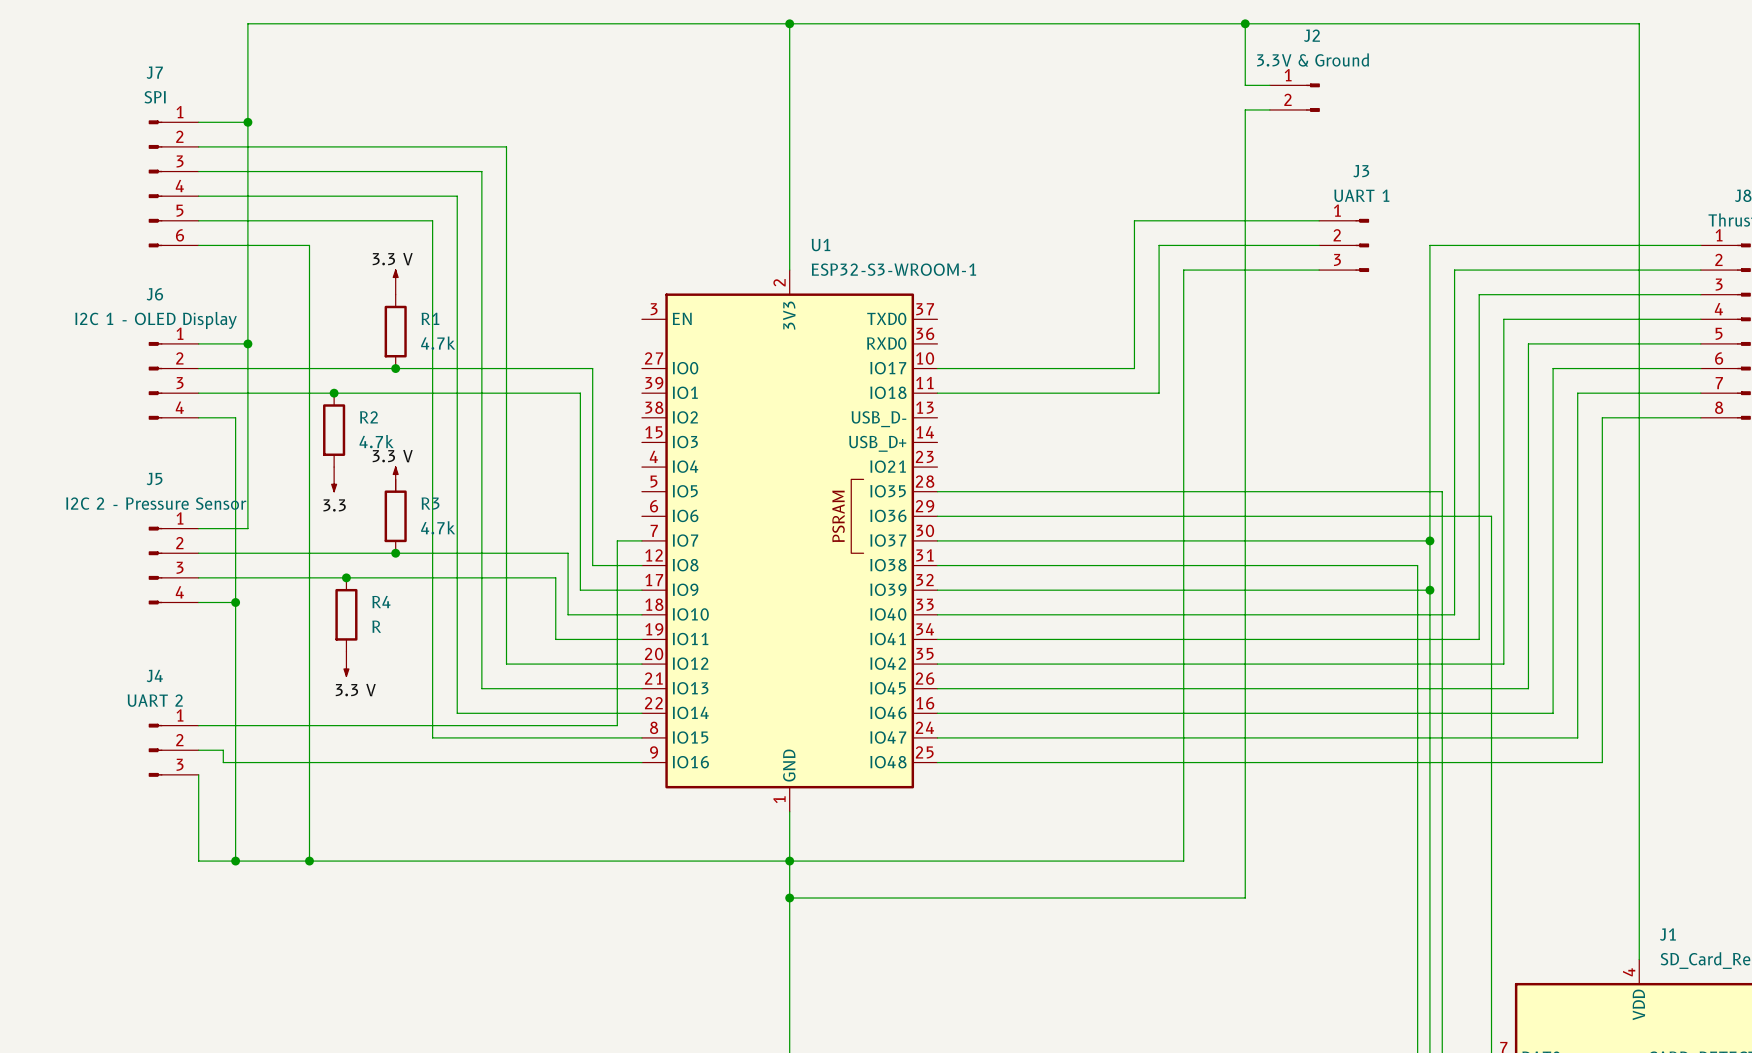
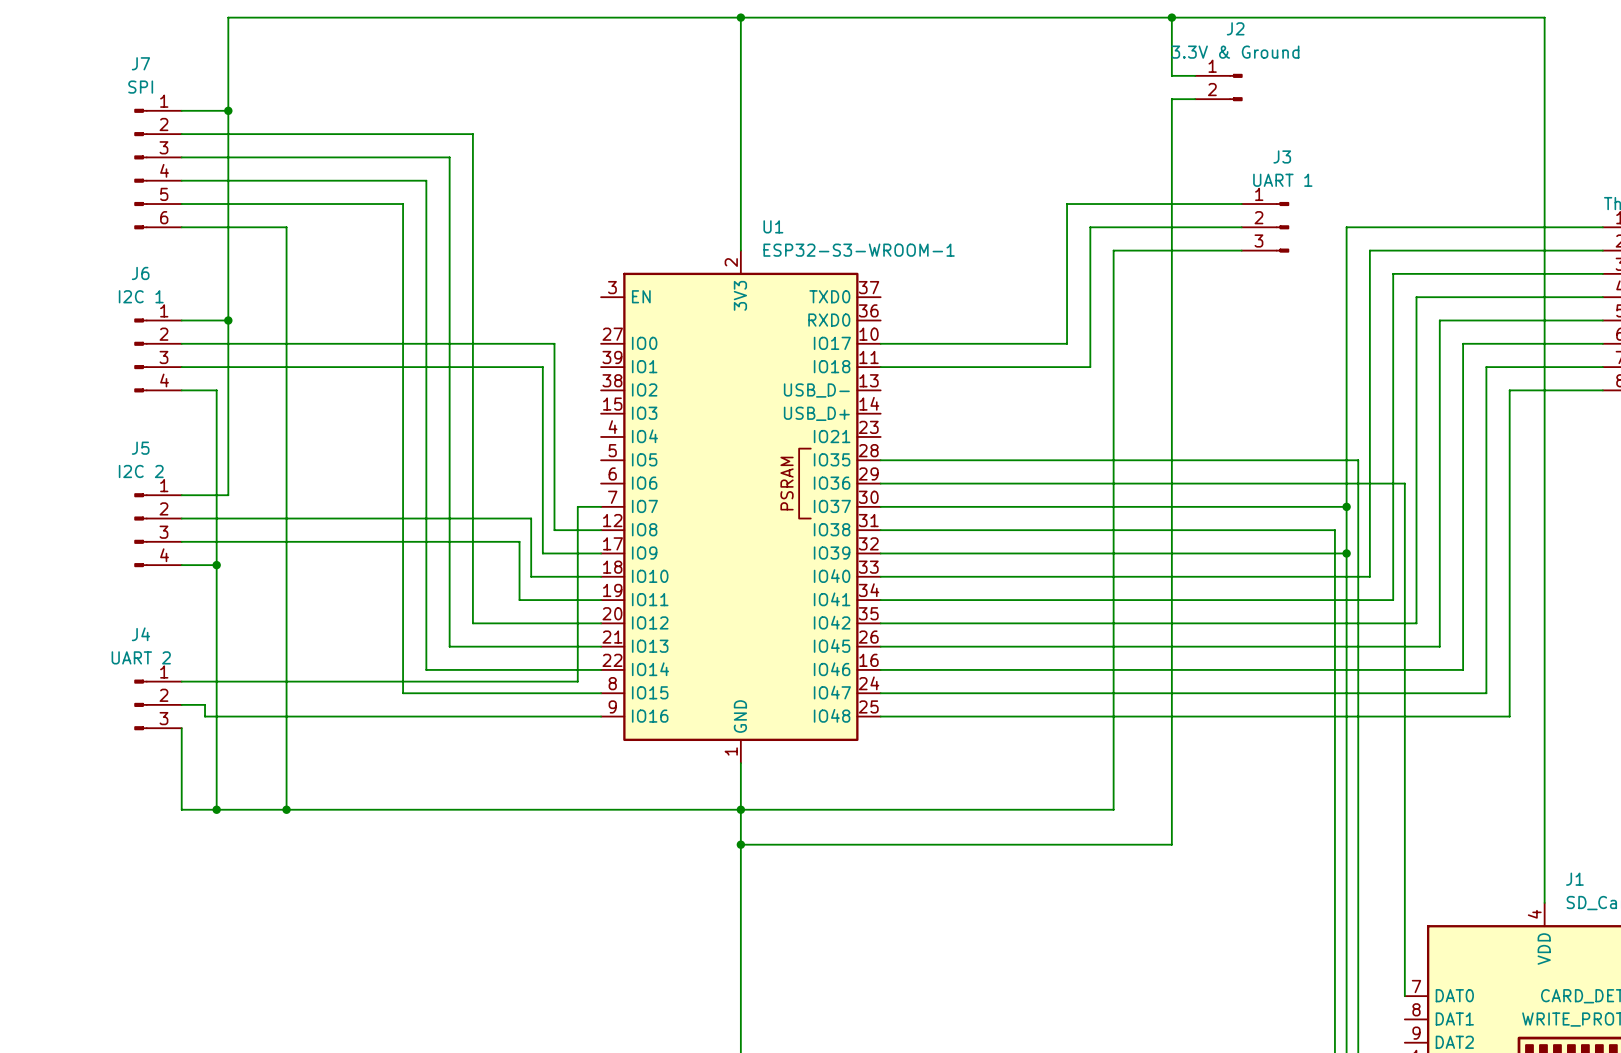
label: 3.3 V (392, 259) -> none
power symbol: (395, 282) -> none
J6 value: I2C 1 - OLED Display (156, 320) -> I2C 1 (141, 296)
R1: 4.7k (395, 331) -> none
junction: (395, 368) -> none
junction: (334, 393) -> none
R2: 4.7k (334, 430) -> none
label: 3.3 V (392, 456) -> none
power symbol: (334, 479) -> none
power symbol: (395, 479) -> none
J5 value: I2C 2 - Pressure Sensor (156, 503) -> I2C 2 (141, 471)
label: 3.3 (334, 505) -> none
R3: 4.7k (395, 516) -> none
junction: (395, 553) -> none
junction: (346, 577) -> none
R4: R (346, 614) -> none
power symbol: (346, 664) -> none
label: 3.3 V (355, 690) -> none

